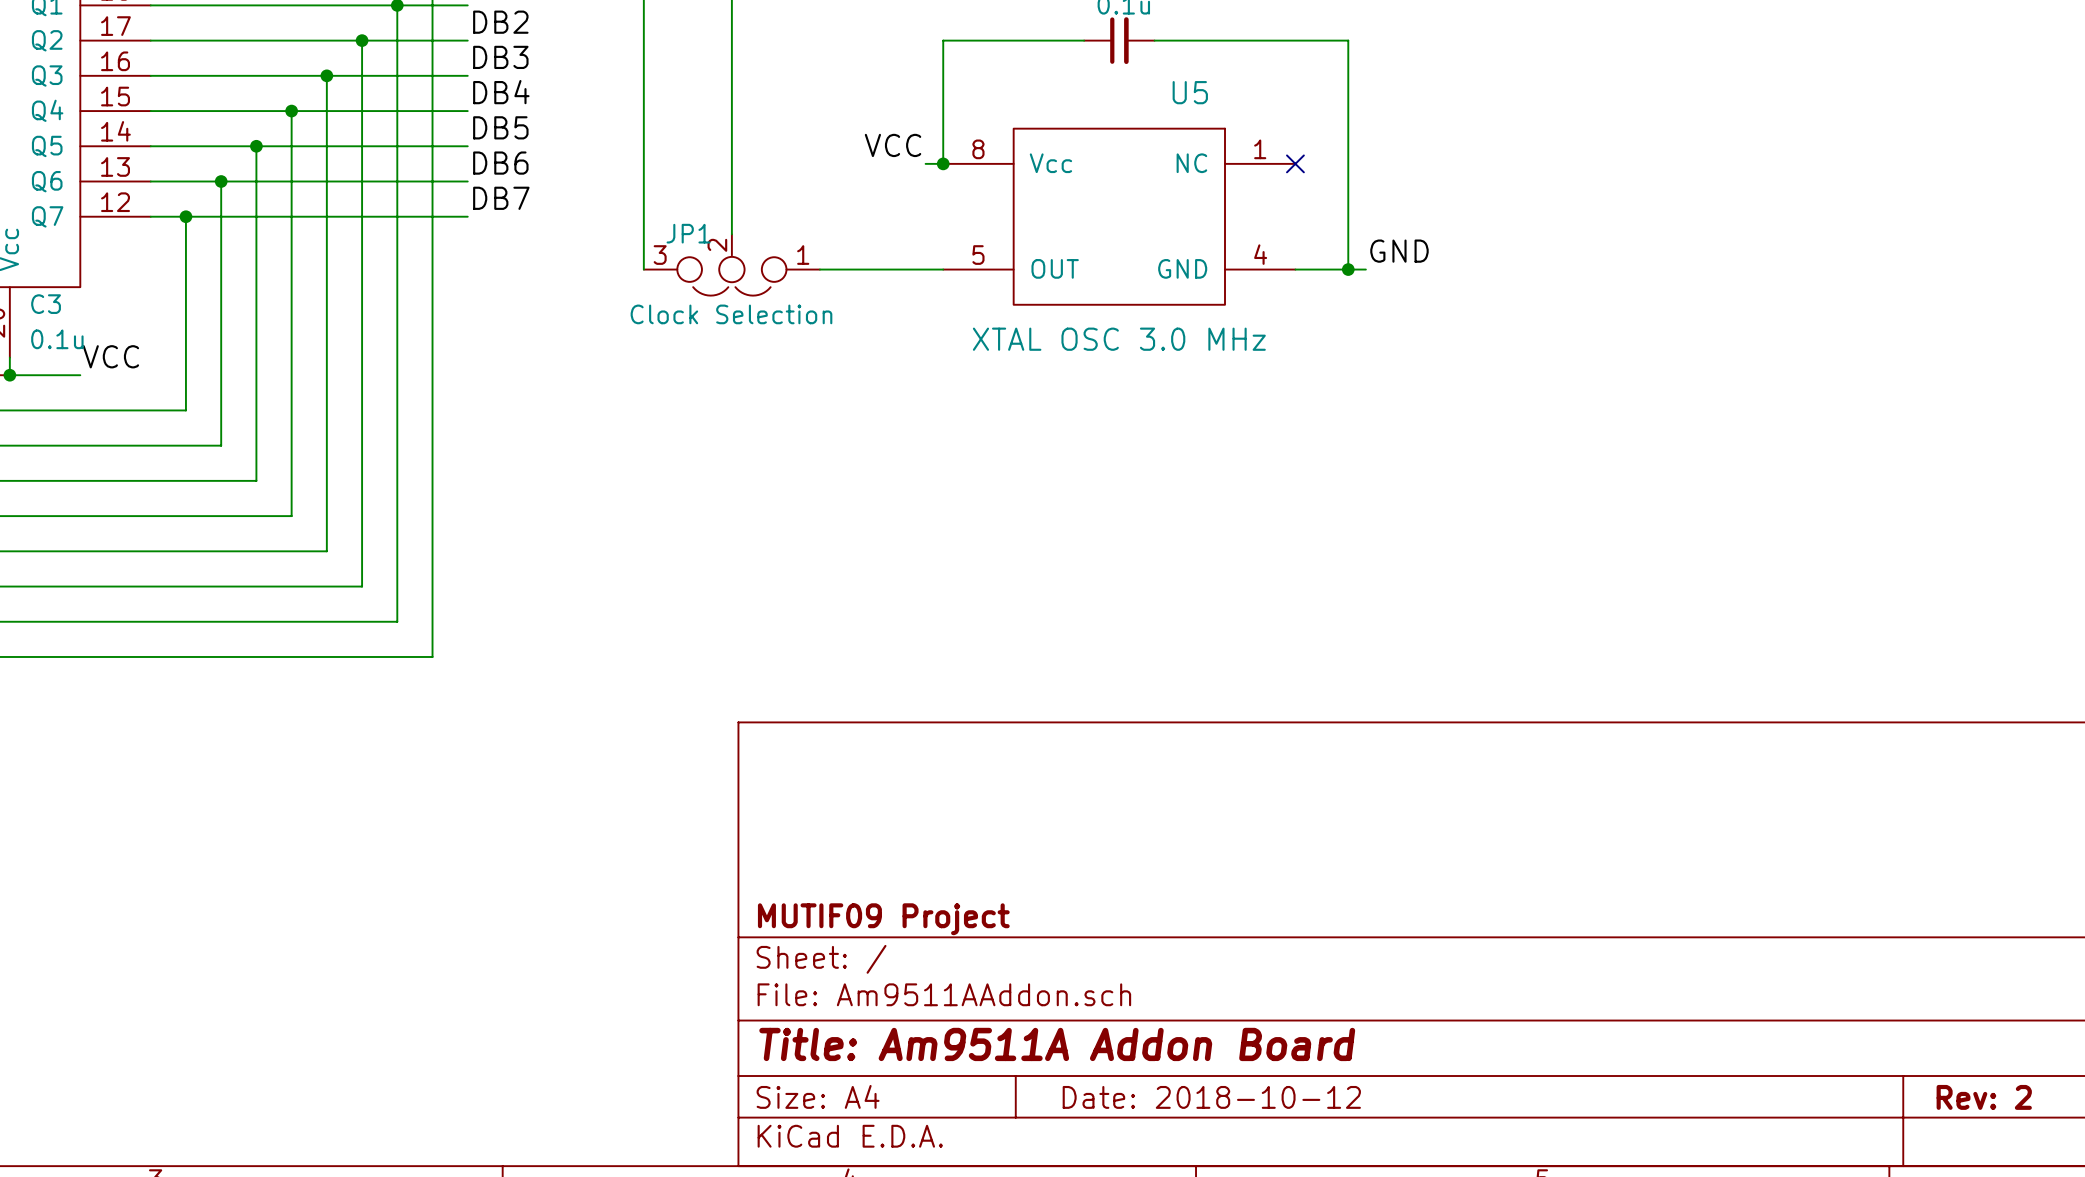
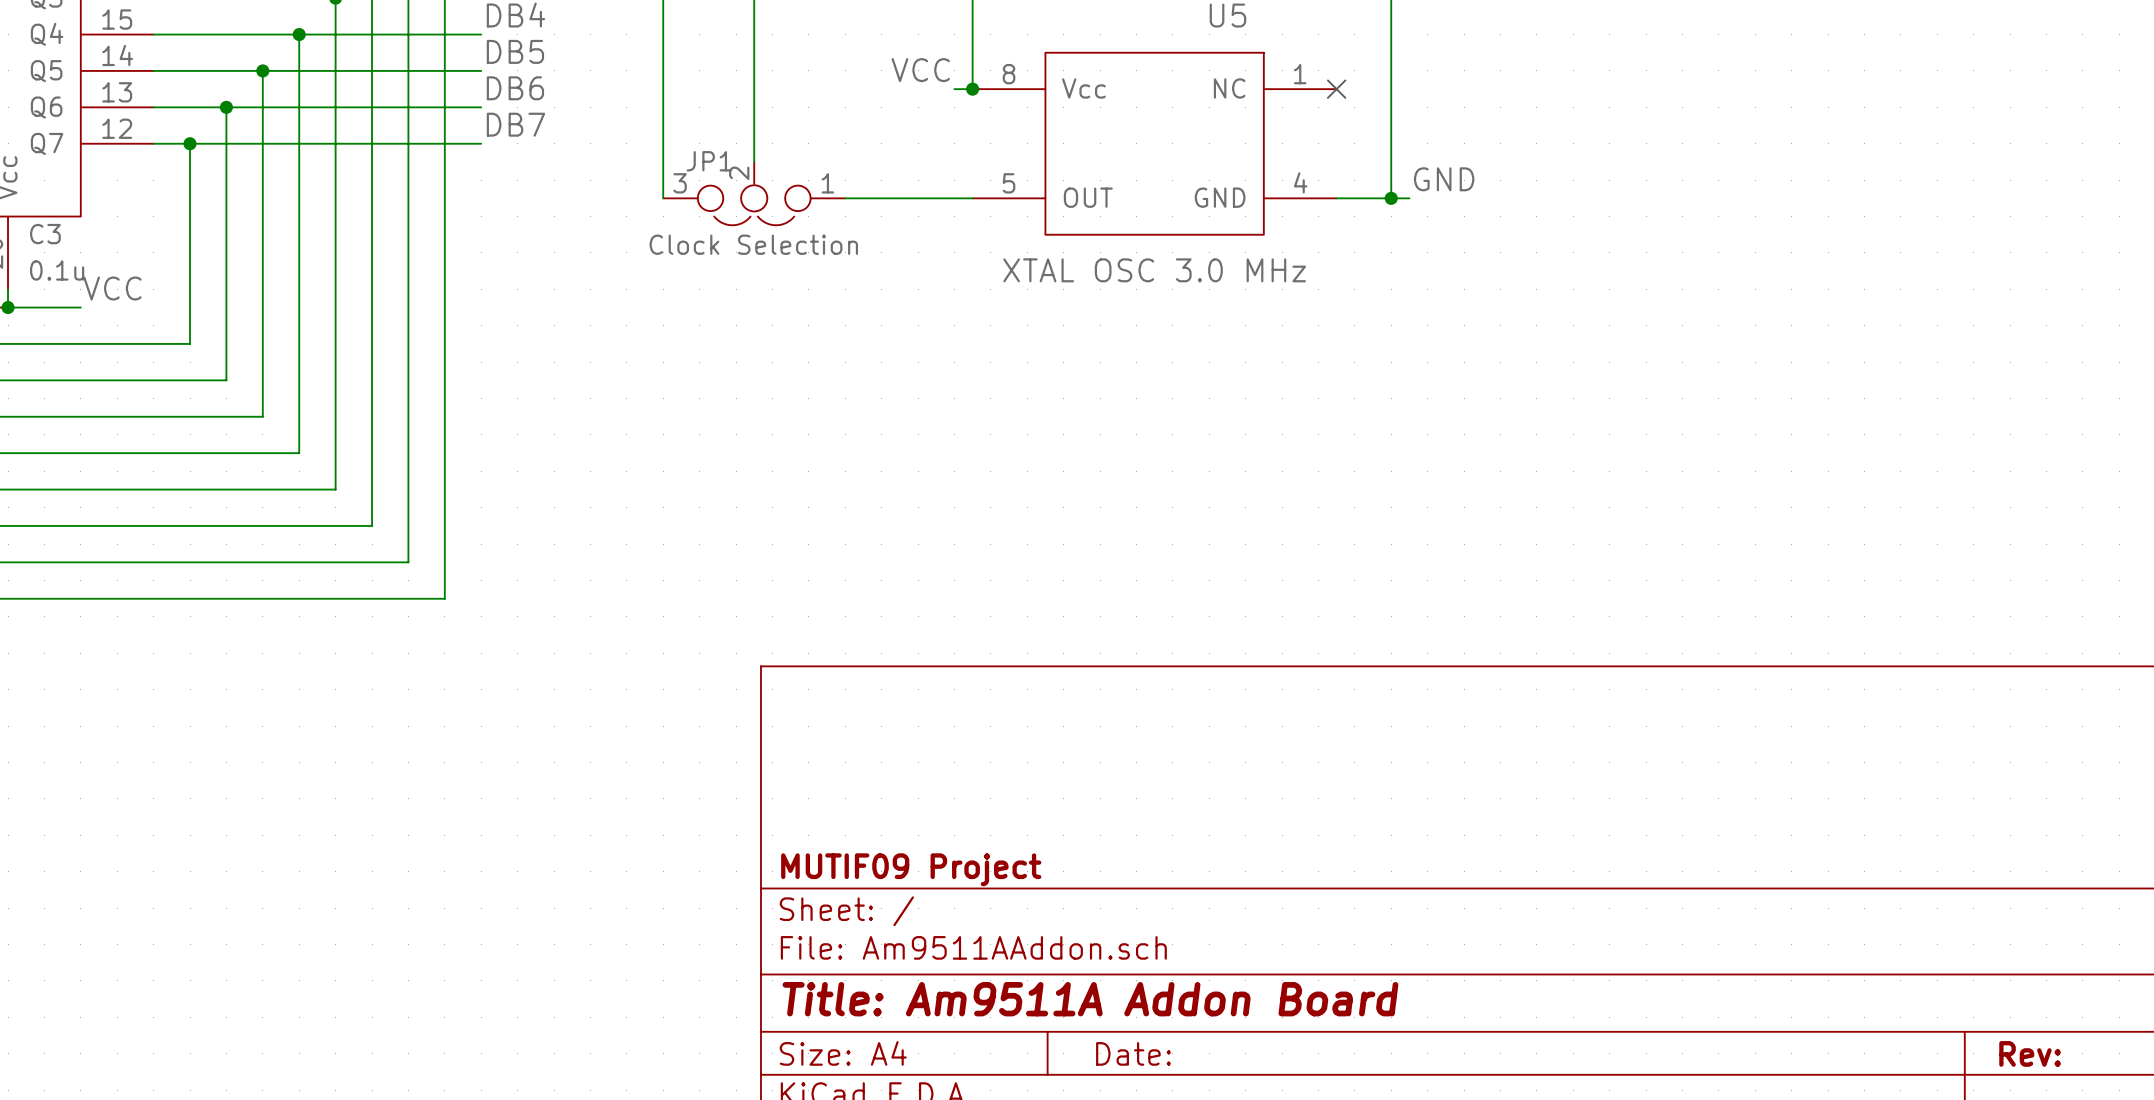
title block: Date: 2018-10-12 (1211, 1097) -> Date: (1133, 1053)
title block: Rev: 2 (1984, 1097) -> Rev: (2030, 1053)

